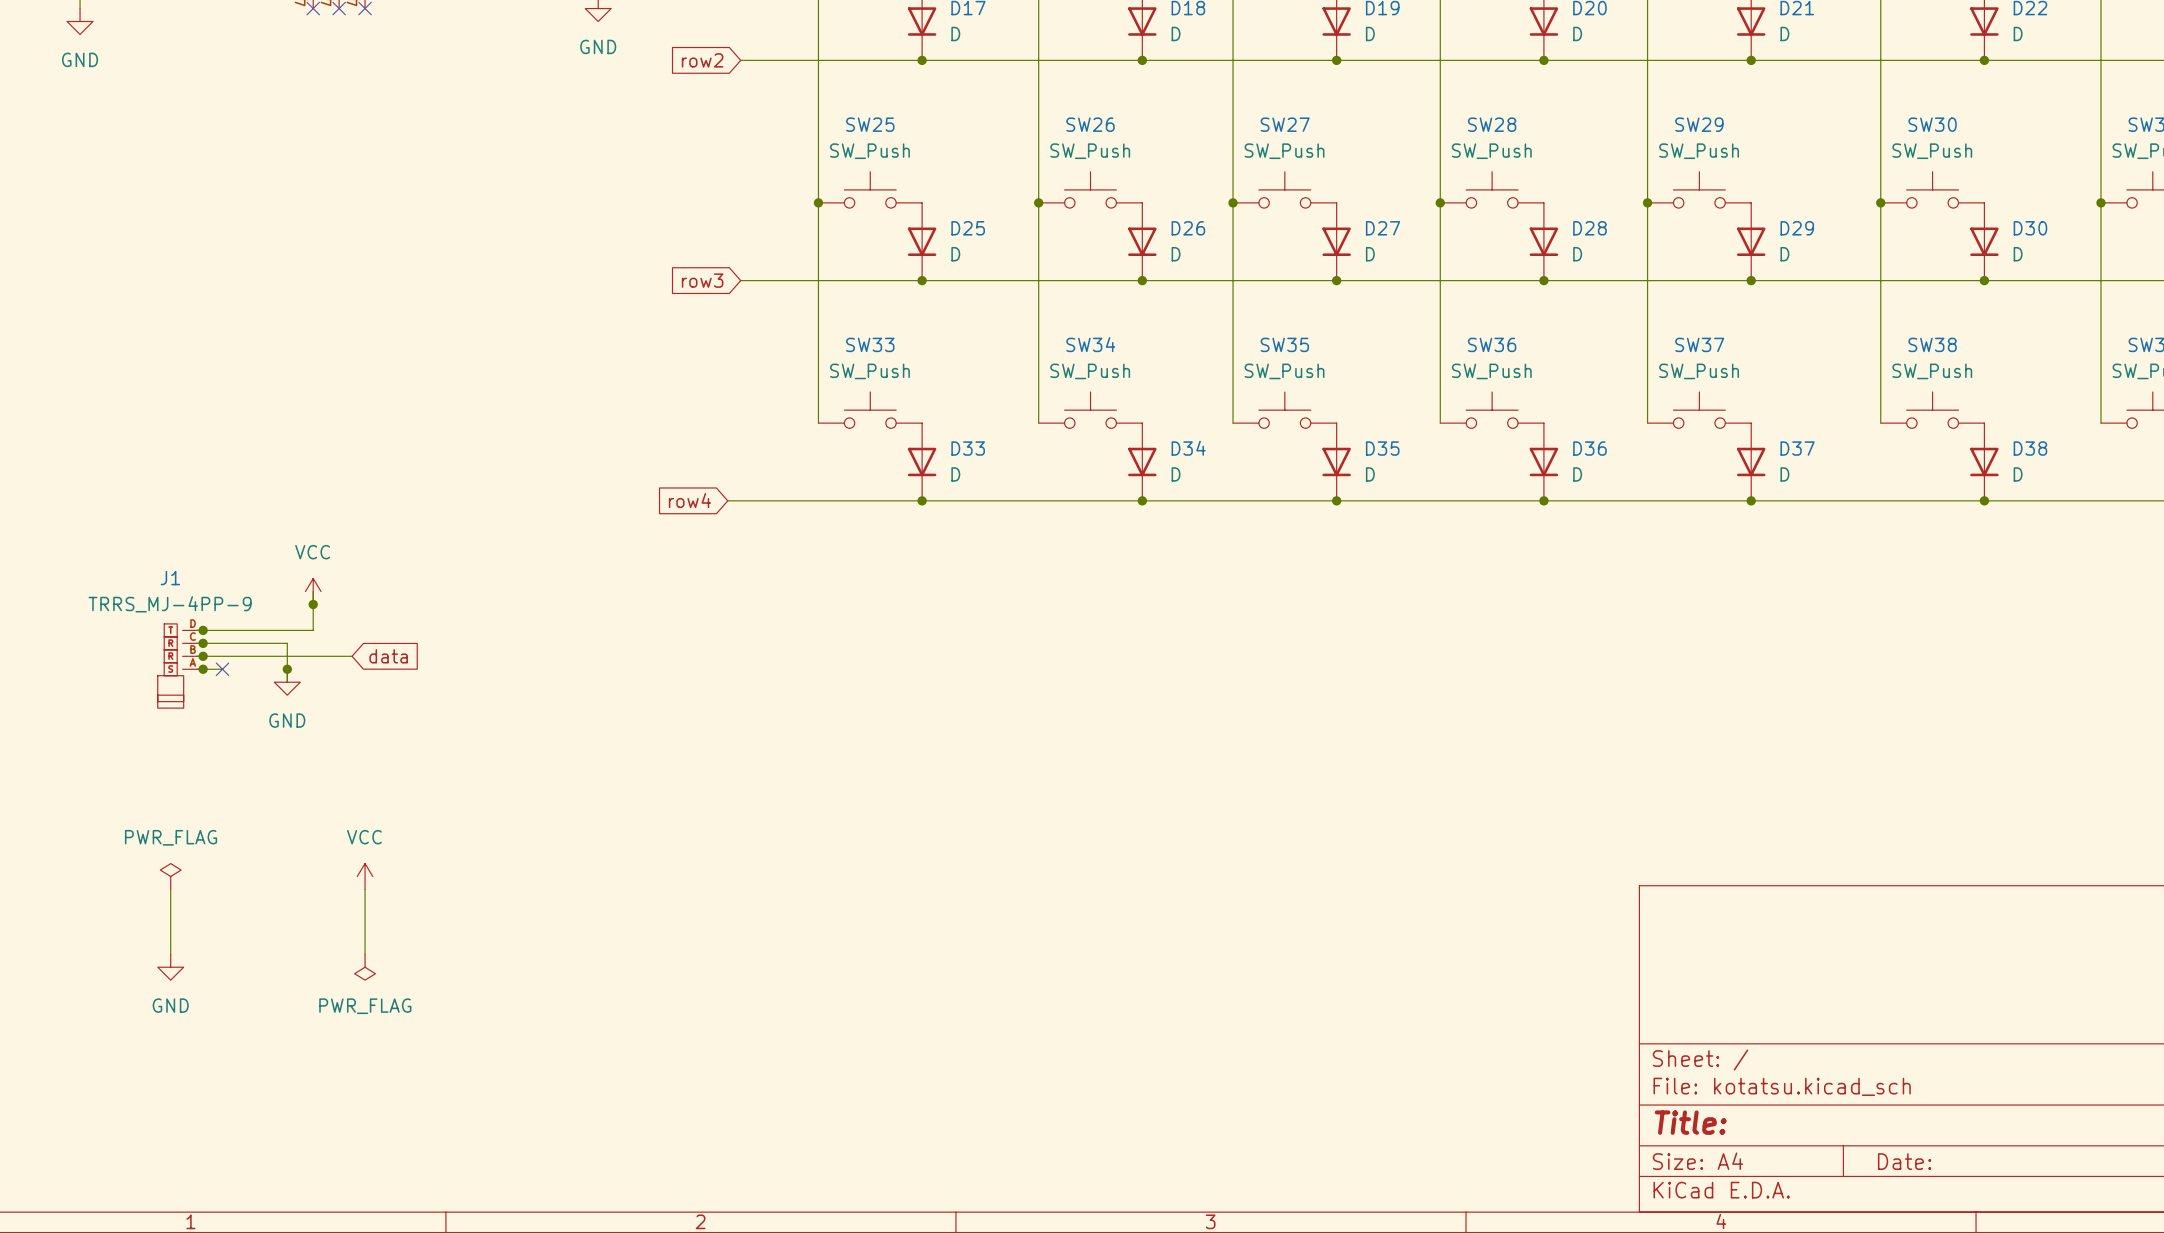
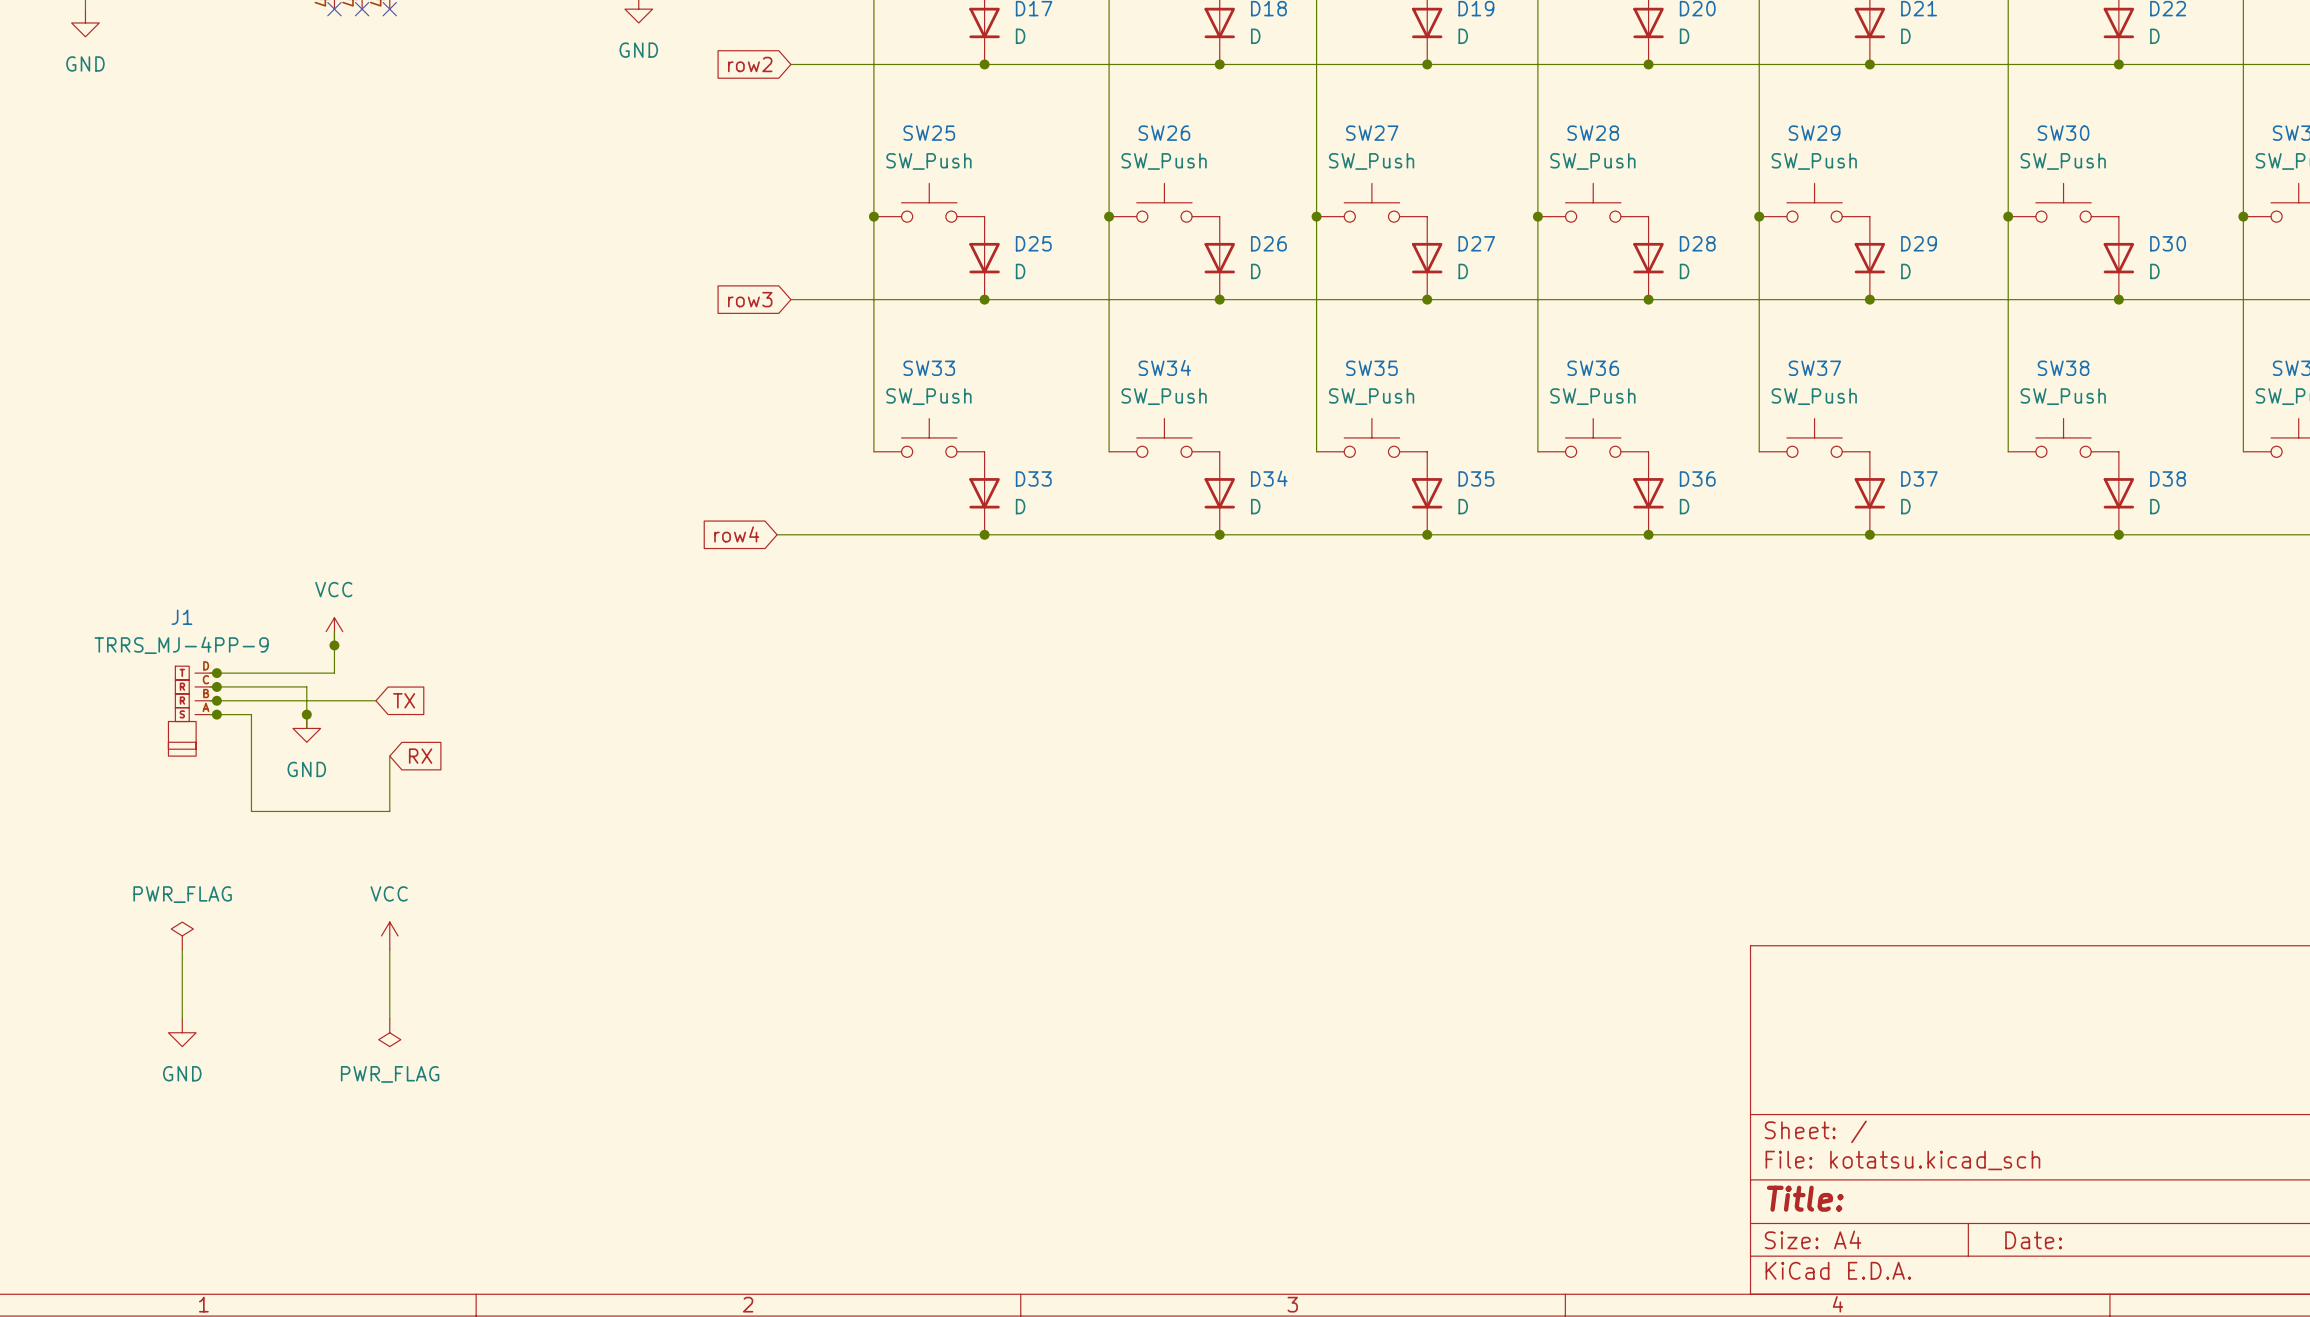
global label: data (388, 656) -> TX (404, 700)
wire: none -> (237, 714) (251, 714) (251, 811) (389, 811) (389, 756)
no-connect mark: (222, 669) -> none
global label: none -> RX (420, 756)

